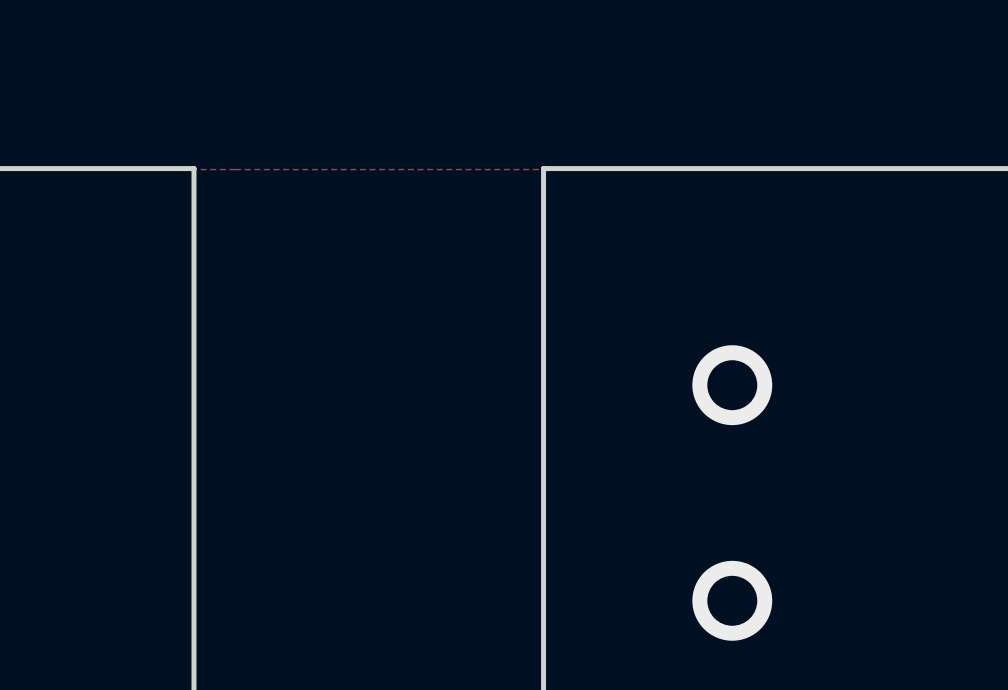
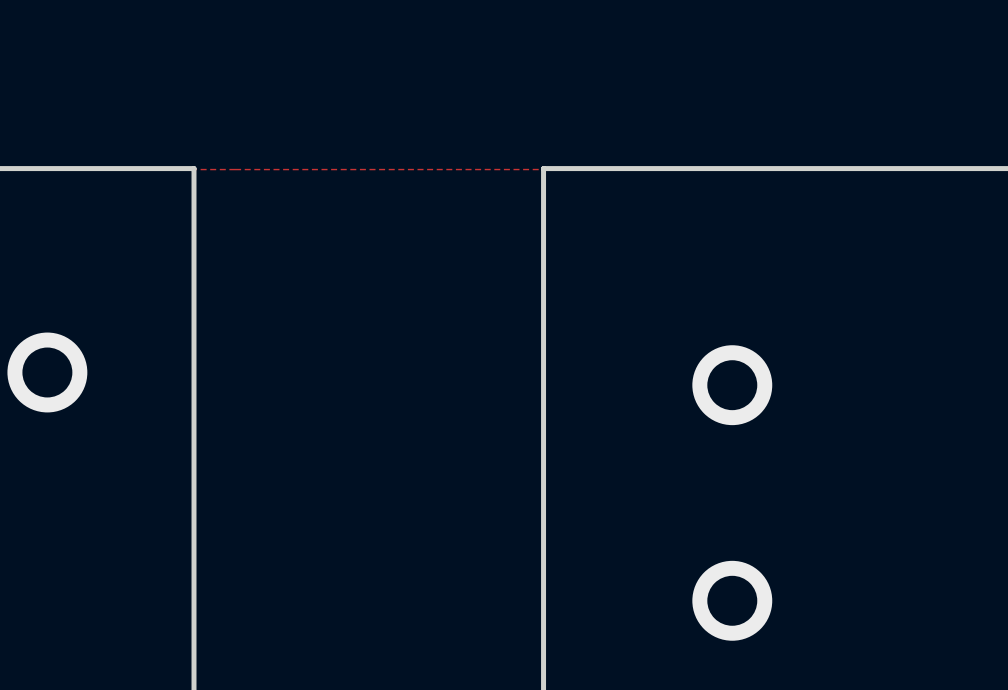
via: none -> (47, 372)

